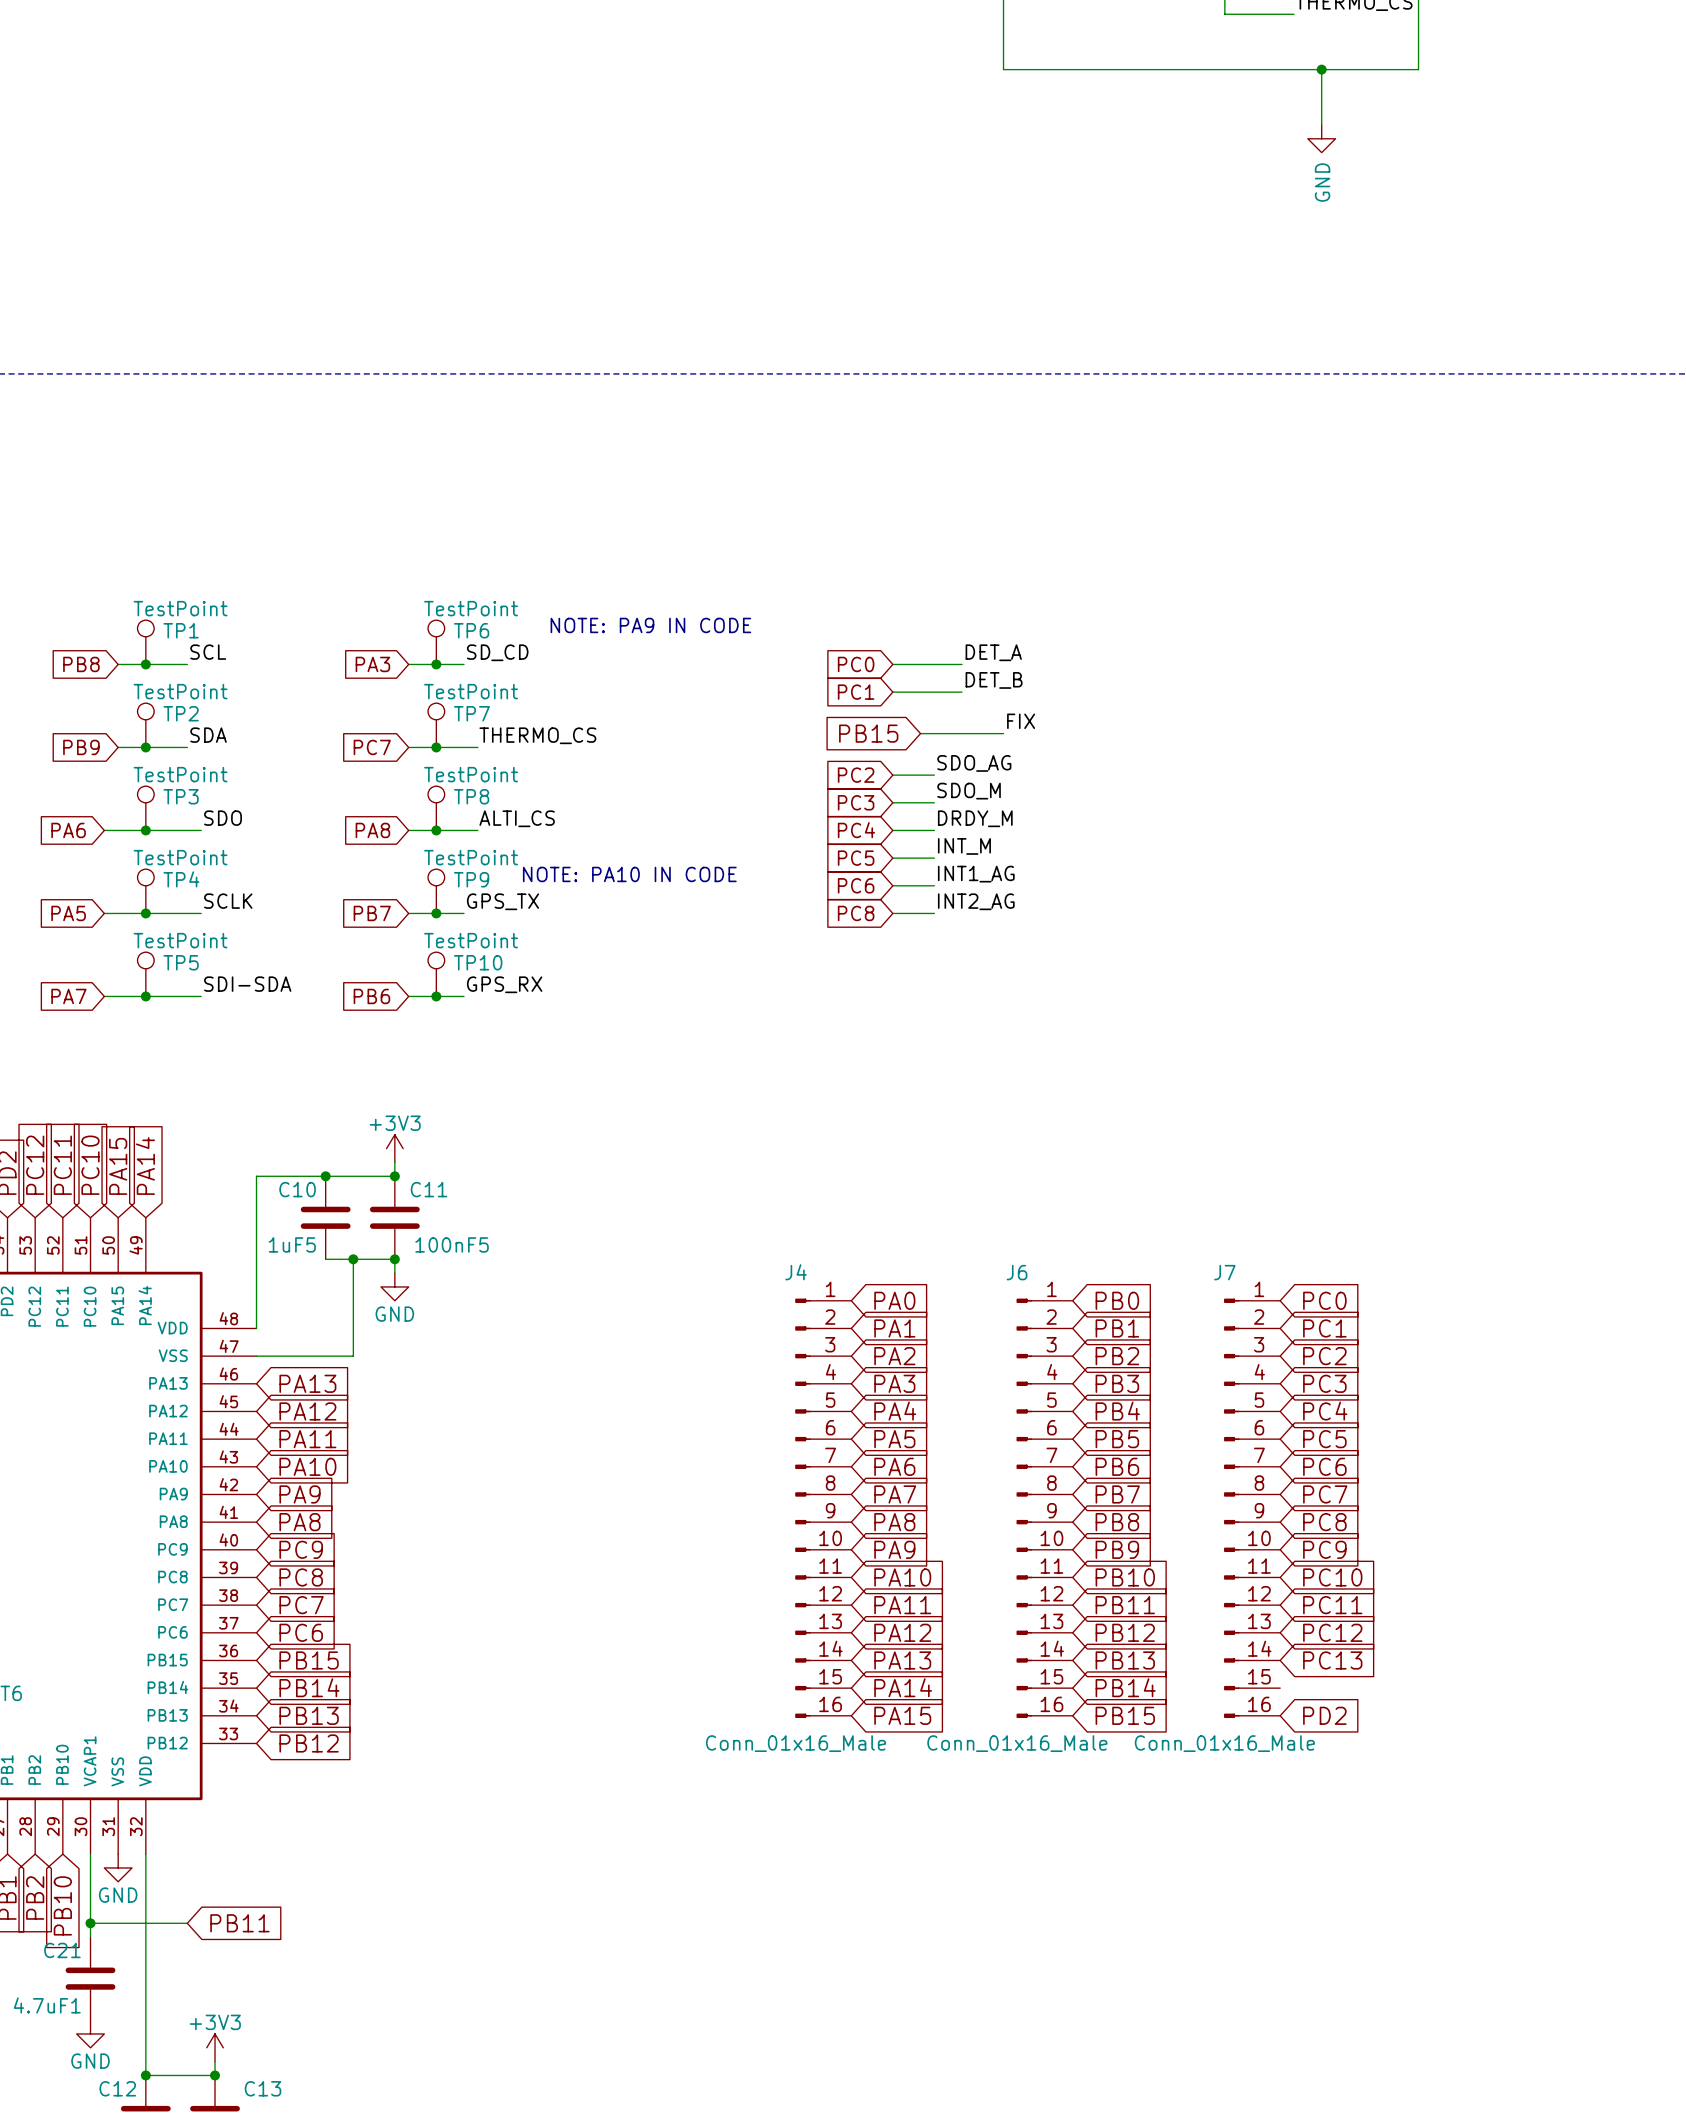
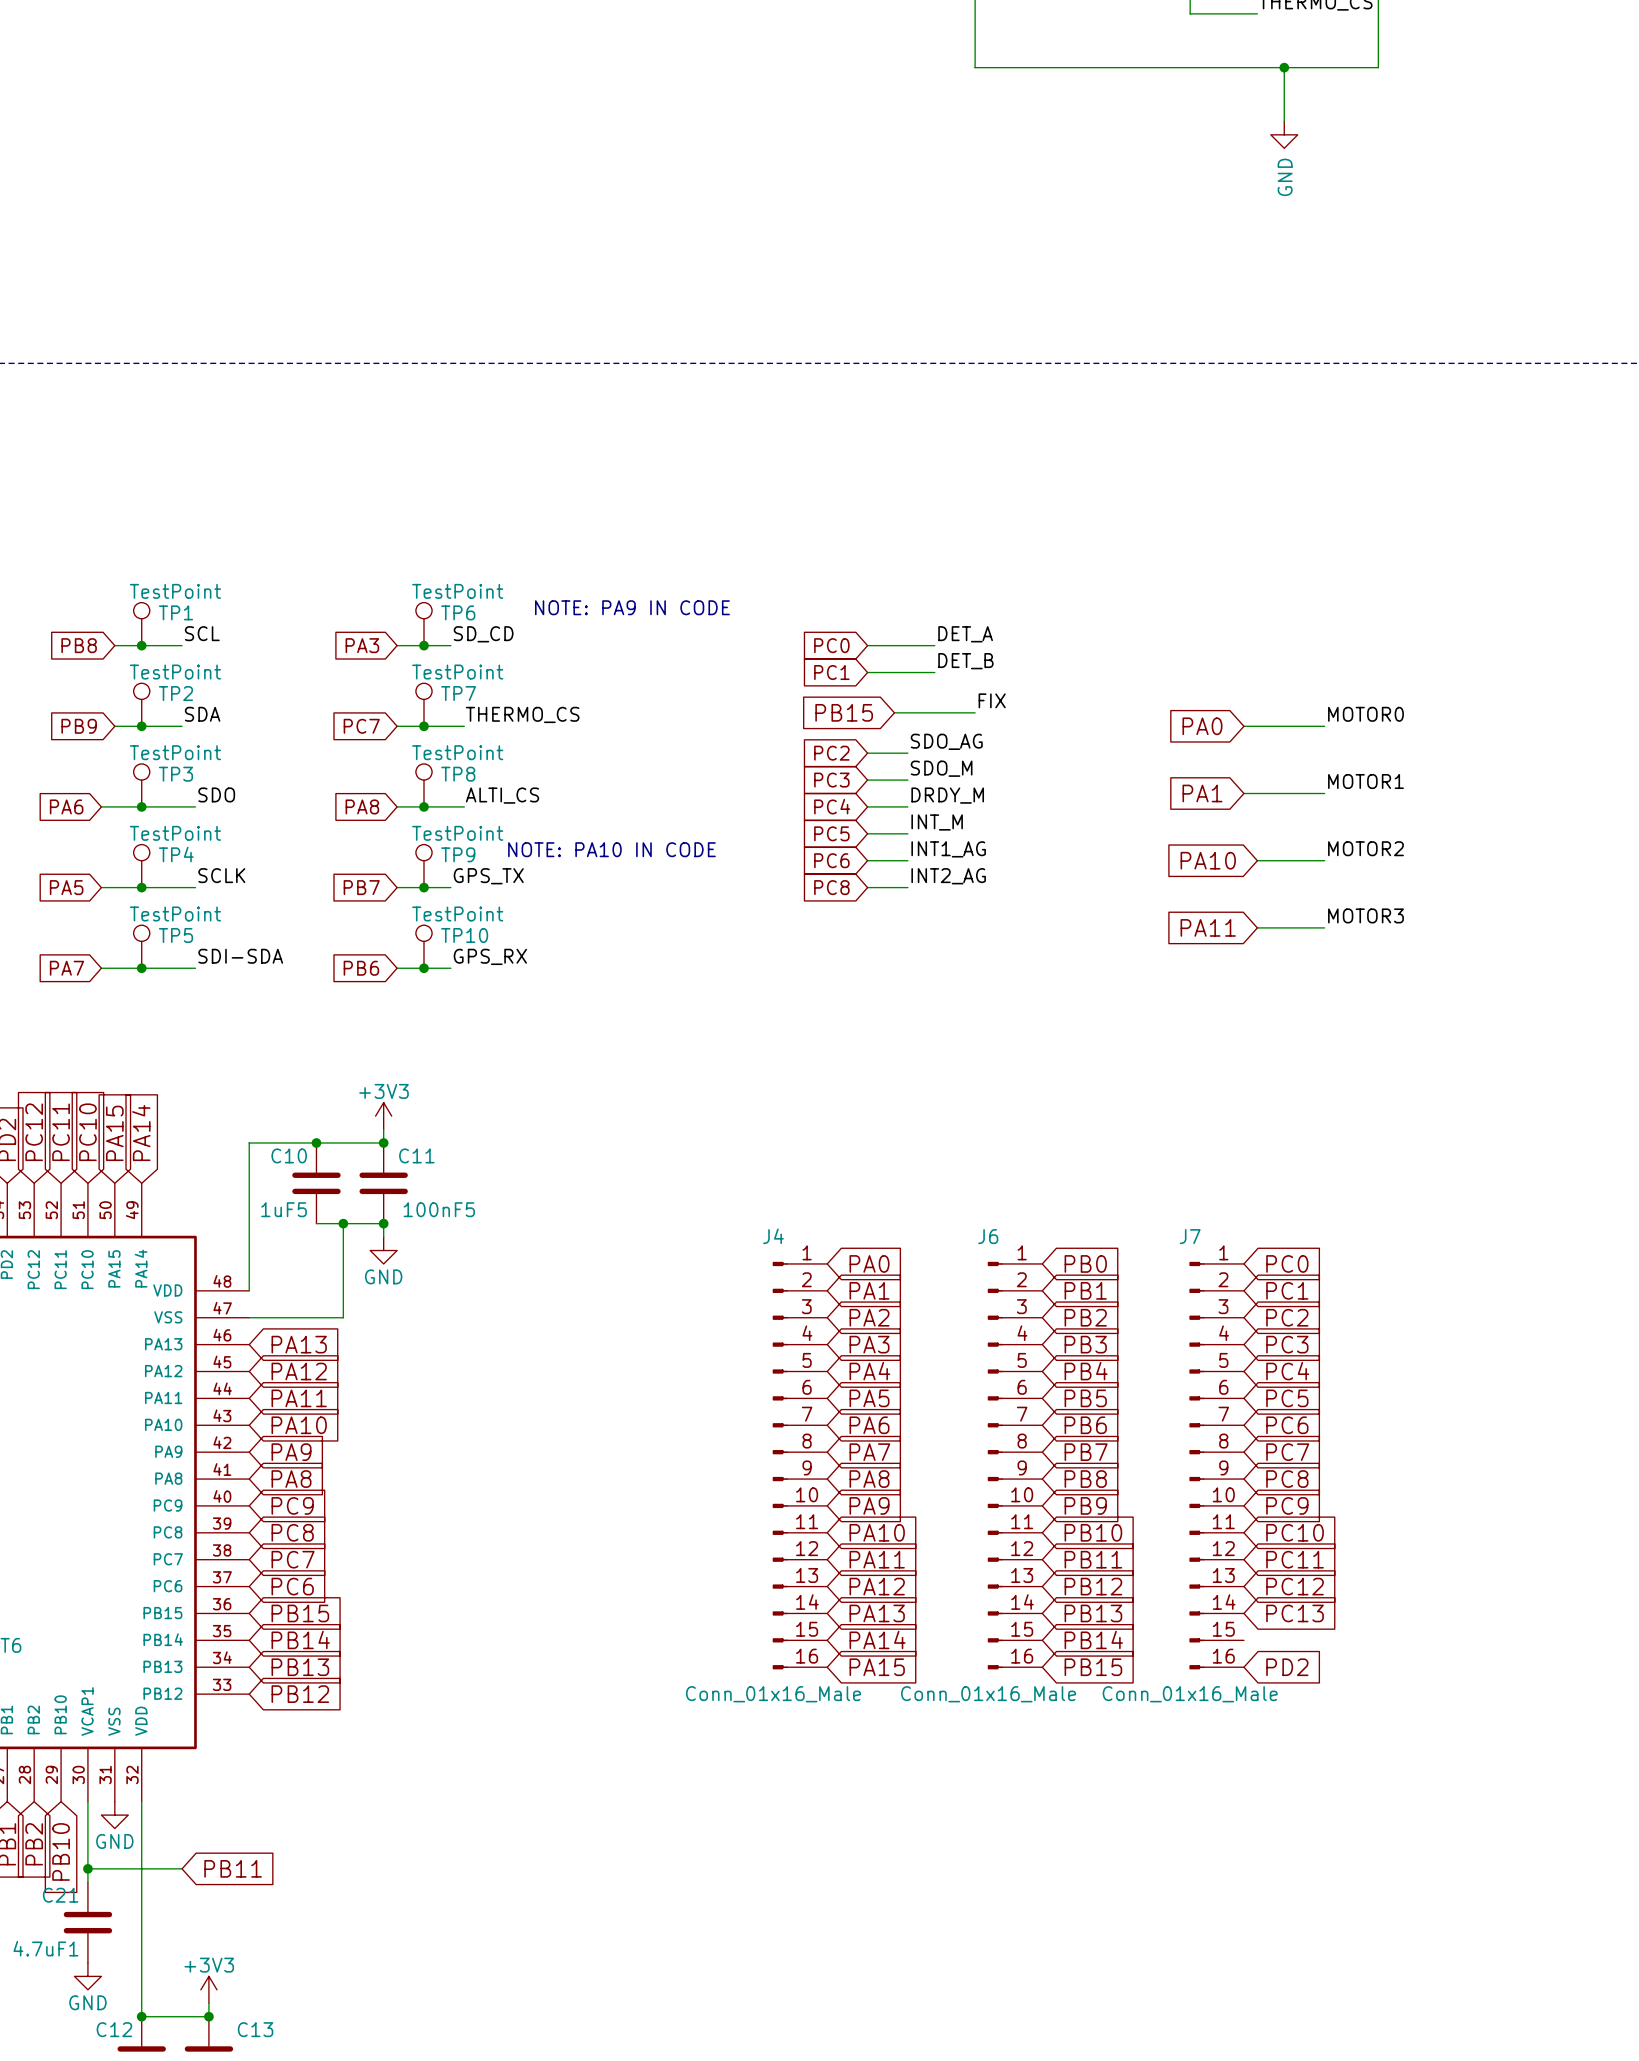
label: none -> MOTOR0 (1365, 714)
global label: none -> PA0 (1202, 726)
wire: none -> (1243, 726) (1324, 726)
label: none -> MOTOR1 (1365, 781)
global label: none -> PA1 (1202, 793)
wire: none -> (1243, 793) (1324, 793)
label: none -> MOTOR2 (1365, 848)
global label: none -> PA10 (1208, 860)
wire: none -> (1257, 860) (1324, 860)
label: none -> MOTOR3 (1365, 915)
global label: none -> PA11 (1208, 927)
wire: none -> (1257, 927) (1324, 927)

